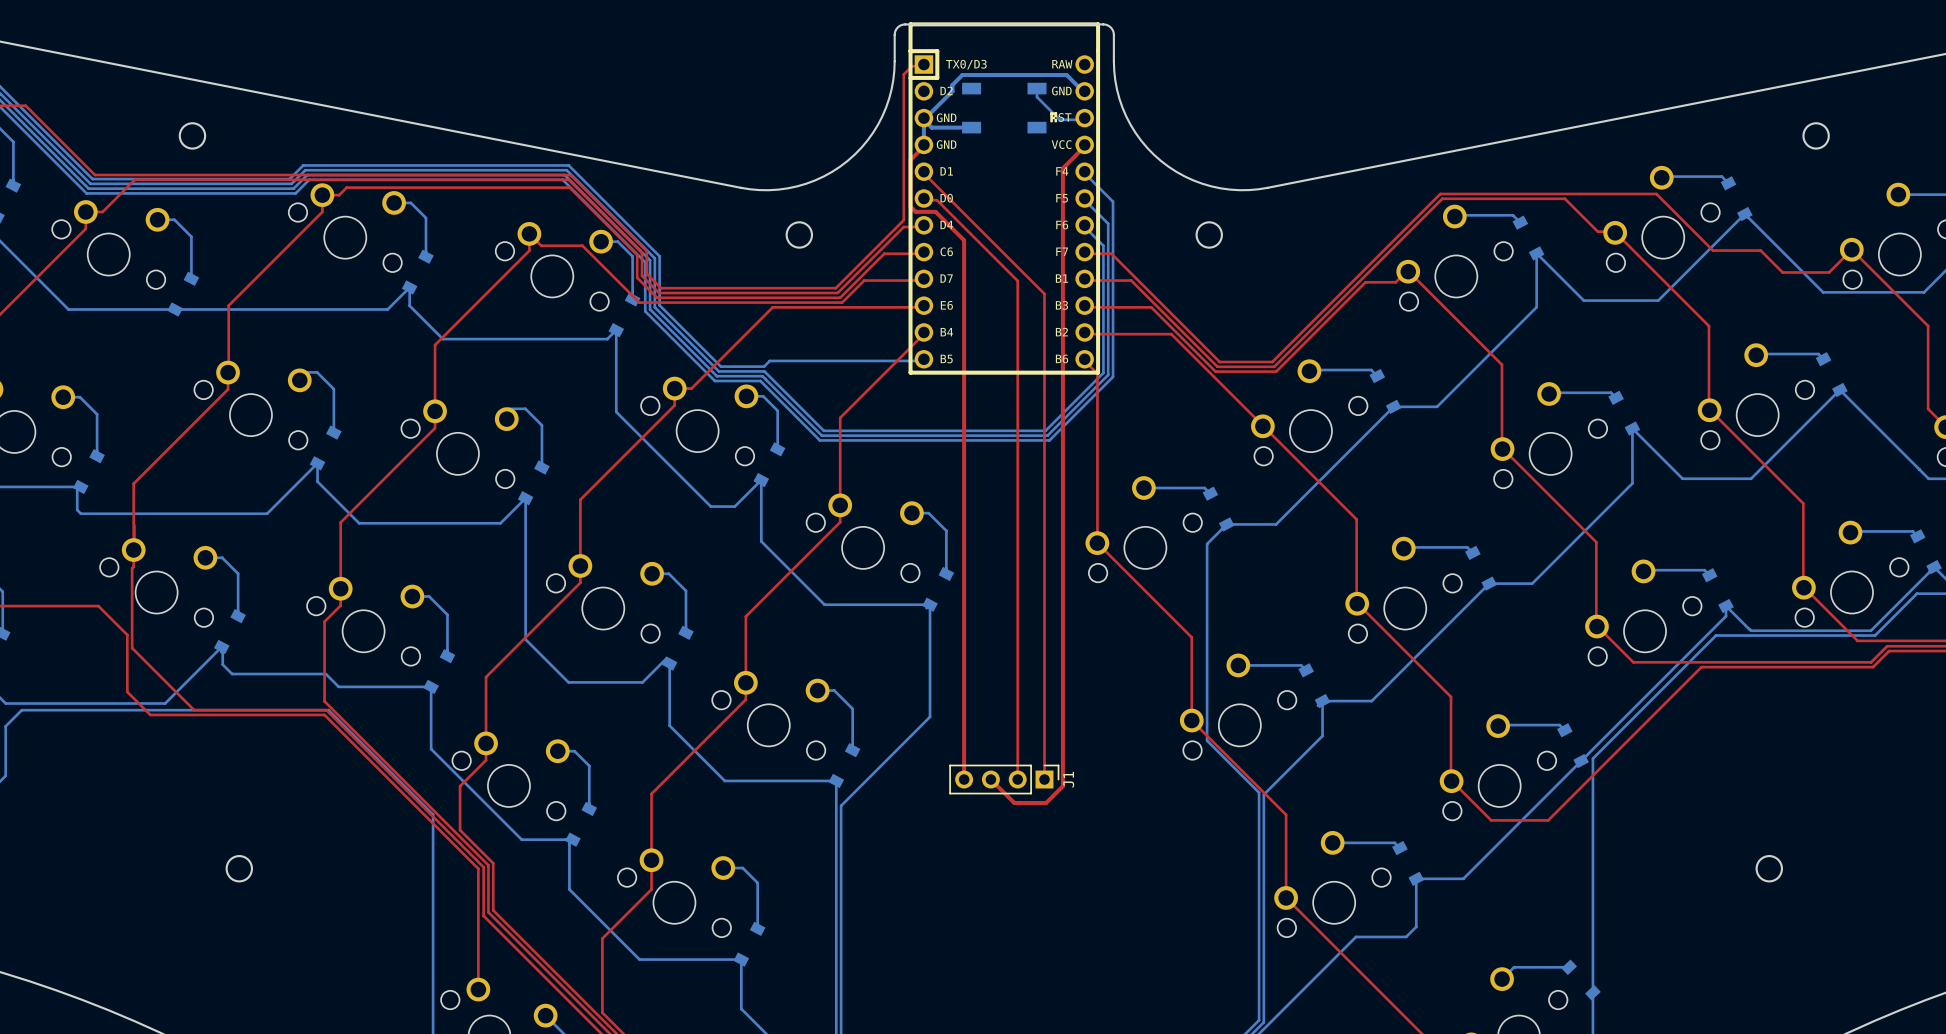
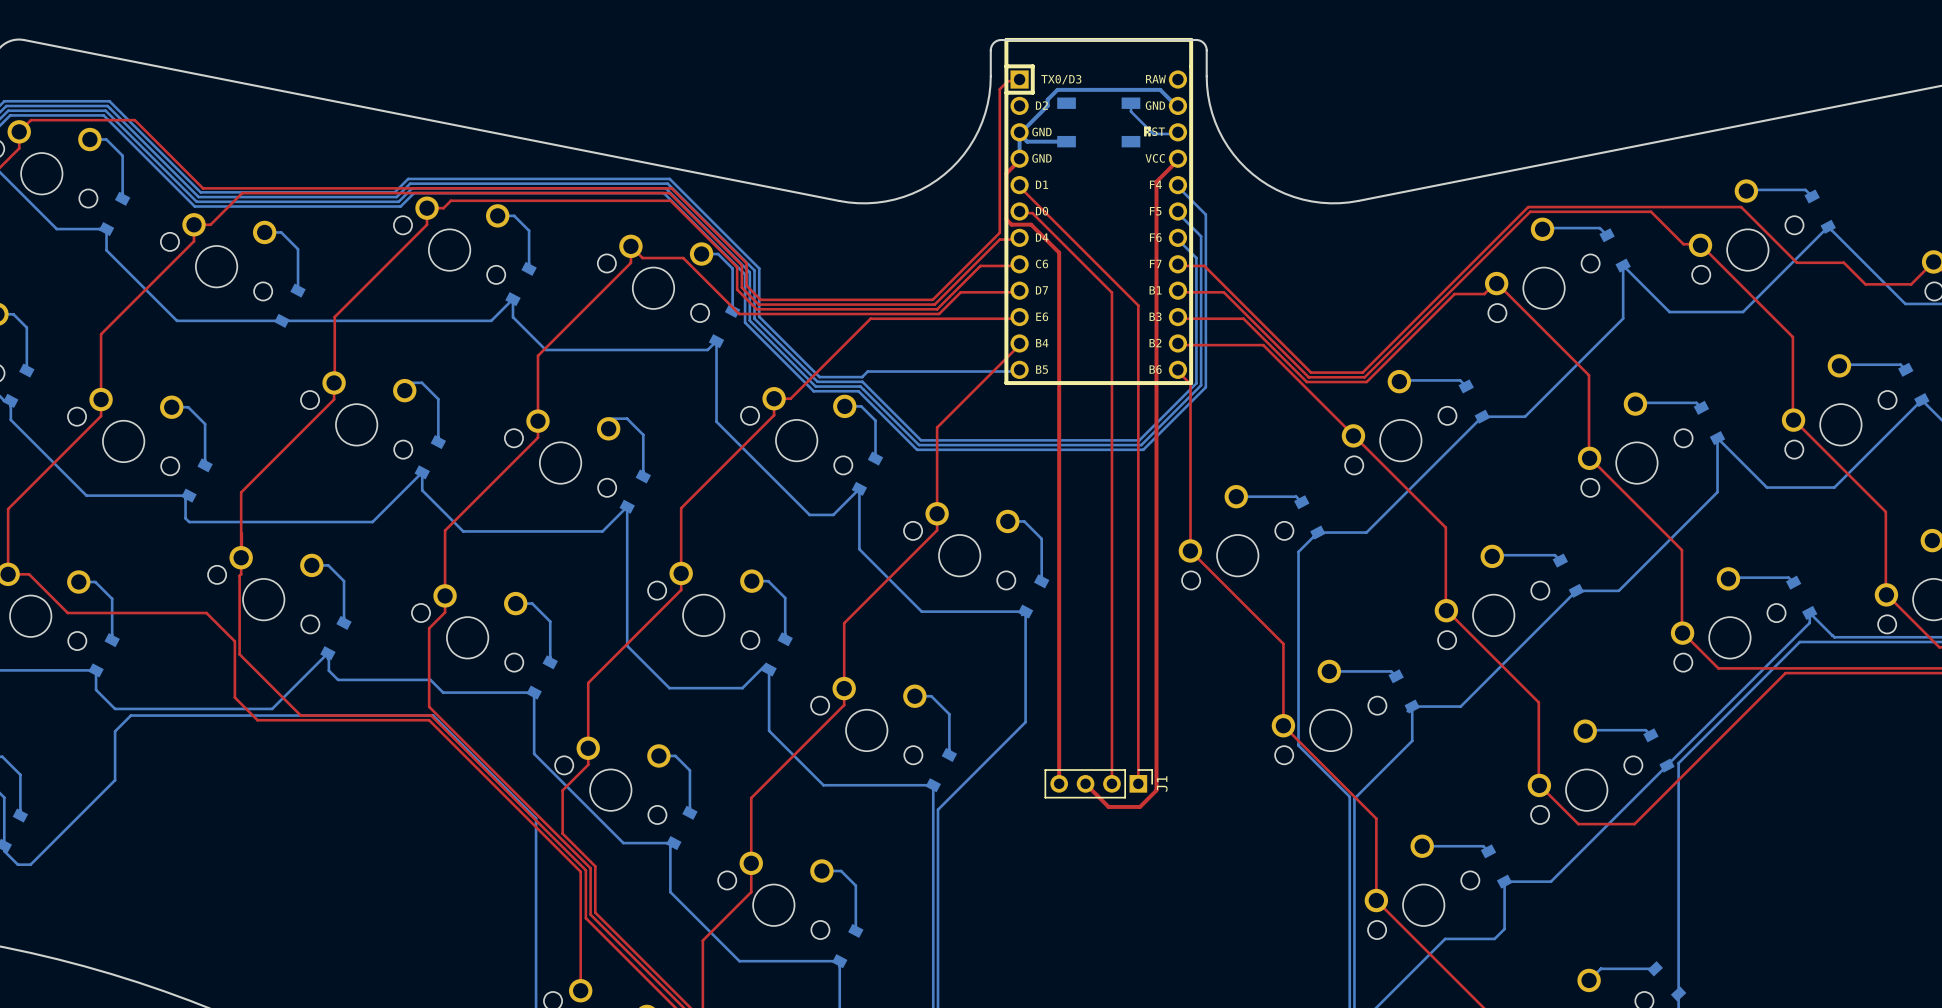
round board edge: [178, 122, 207, 150] -> none
round board edge: [1802, 122, 1830, 150] -> none
round board edge: [785, 221, 814, 249] -> none
round board edge: [1195, 221, 1223, 249] -> none
round board edge: [225, 855, 254, 883] -> none
round board edge: [1755, 855, 1783, 883] -> none

